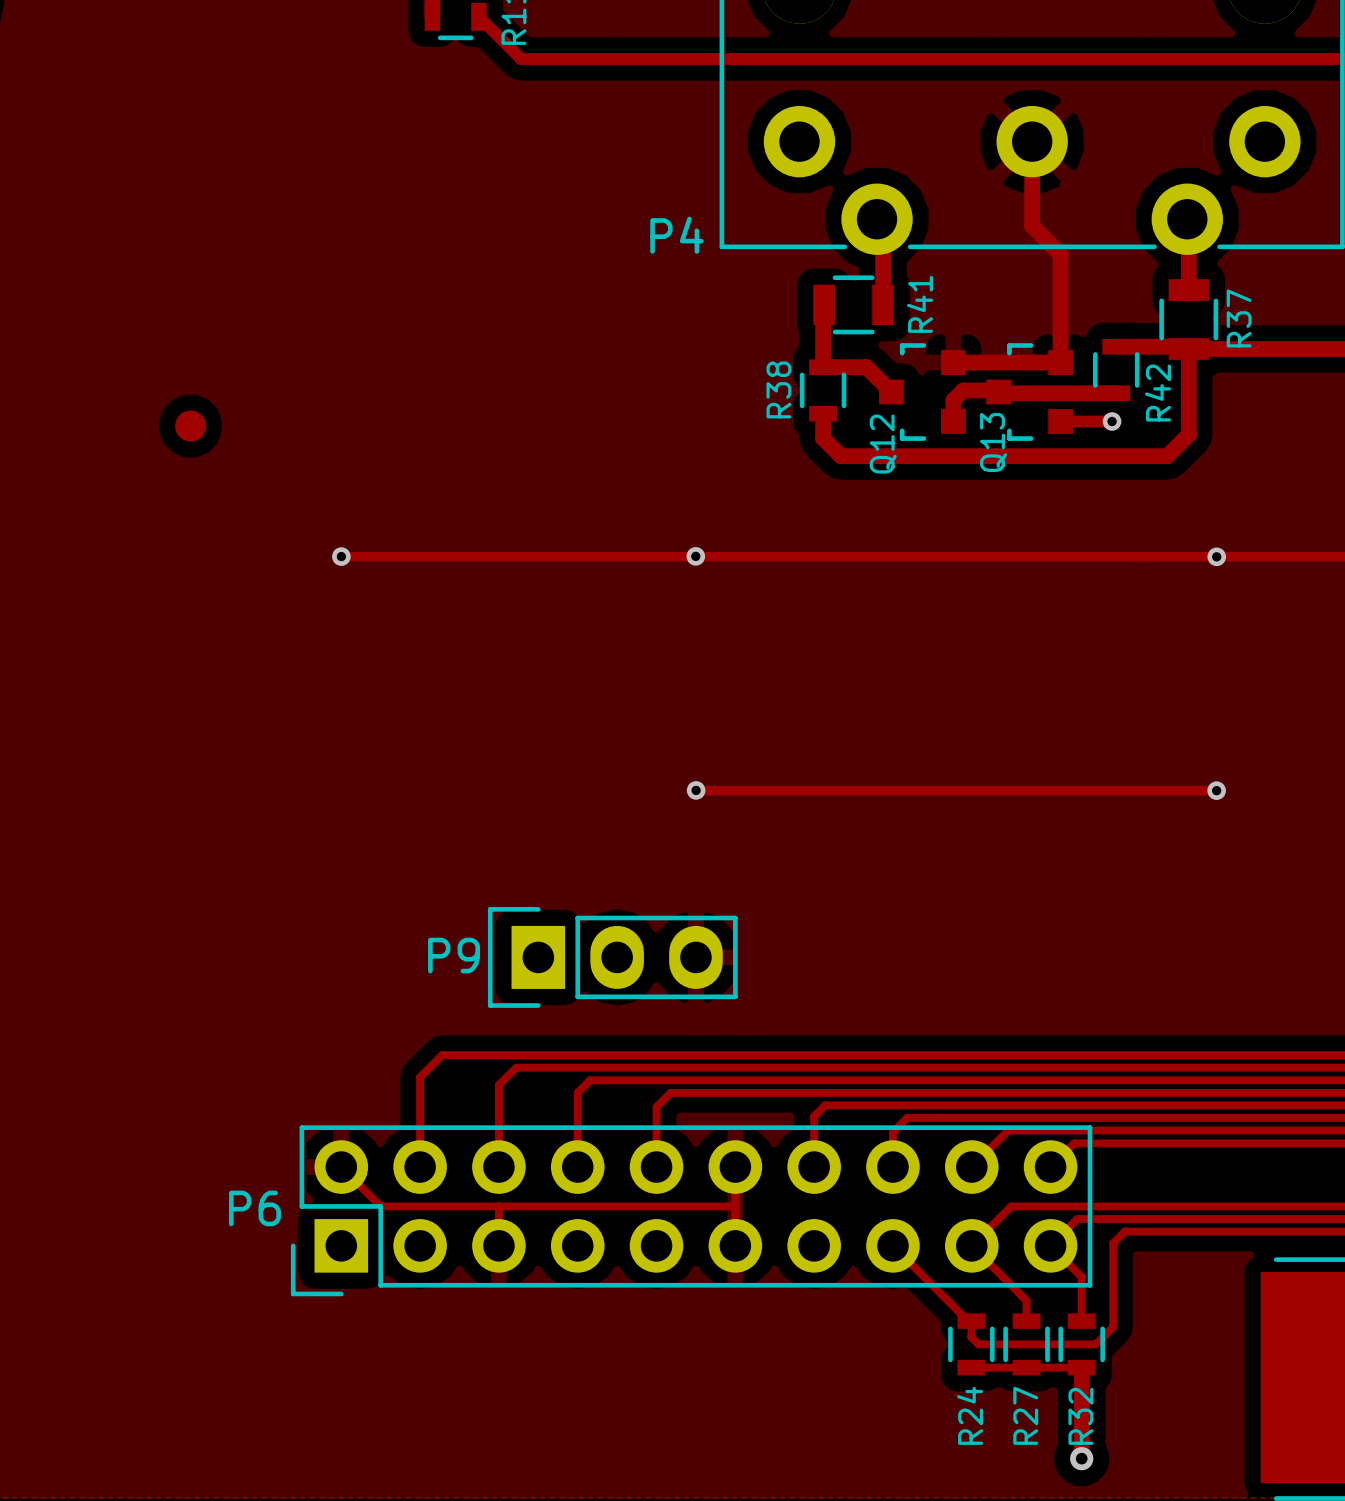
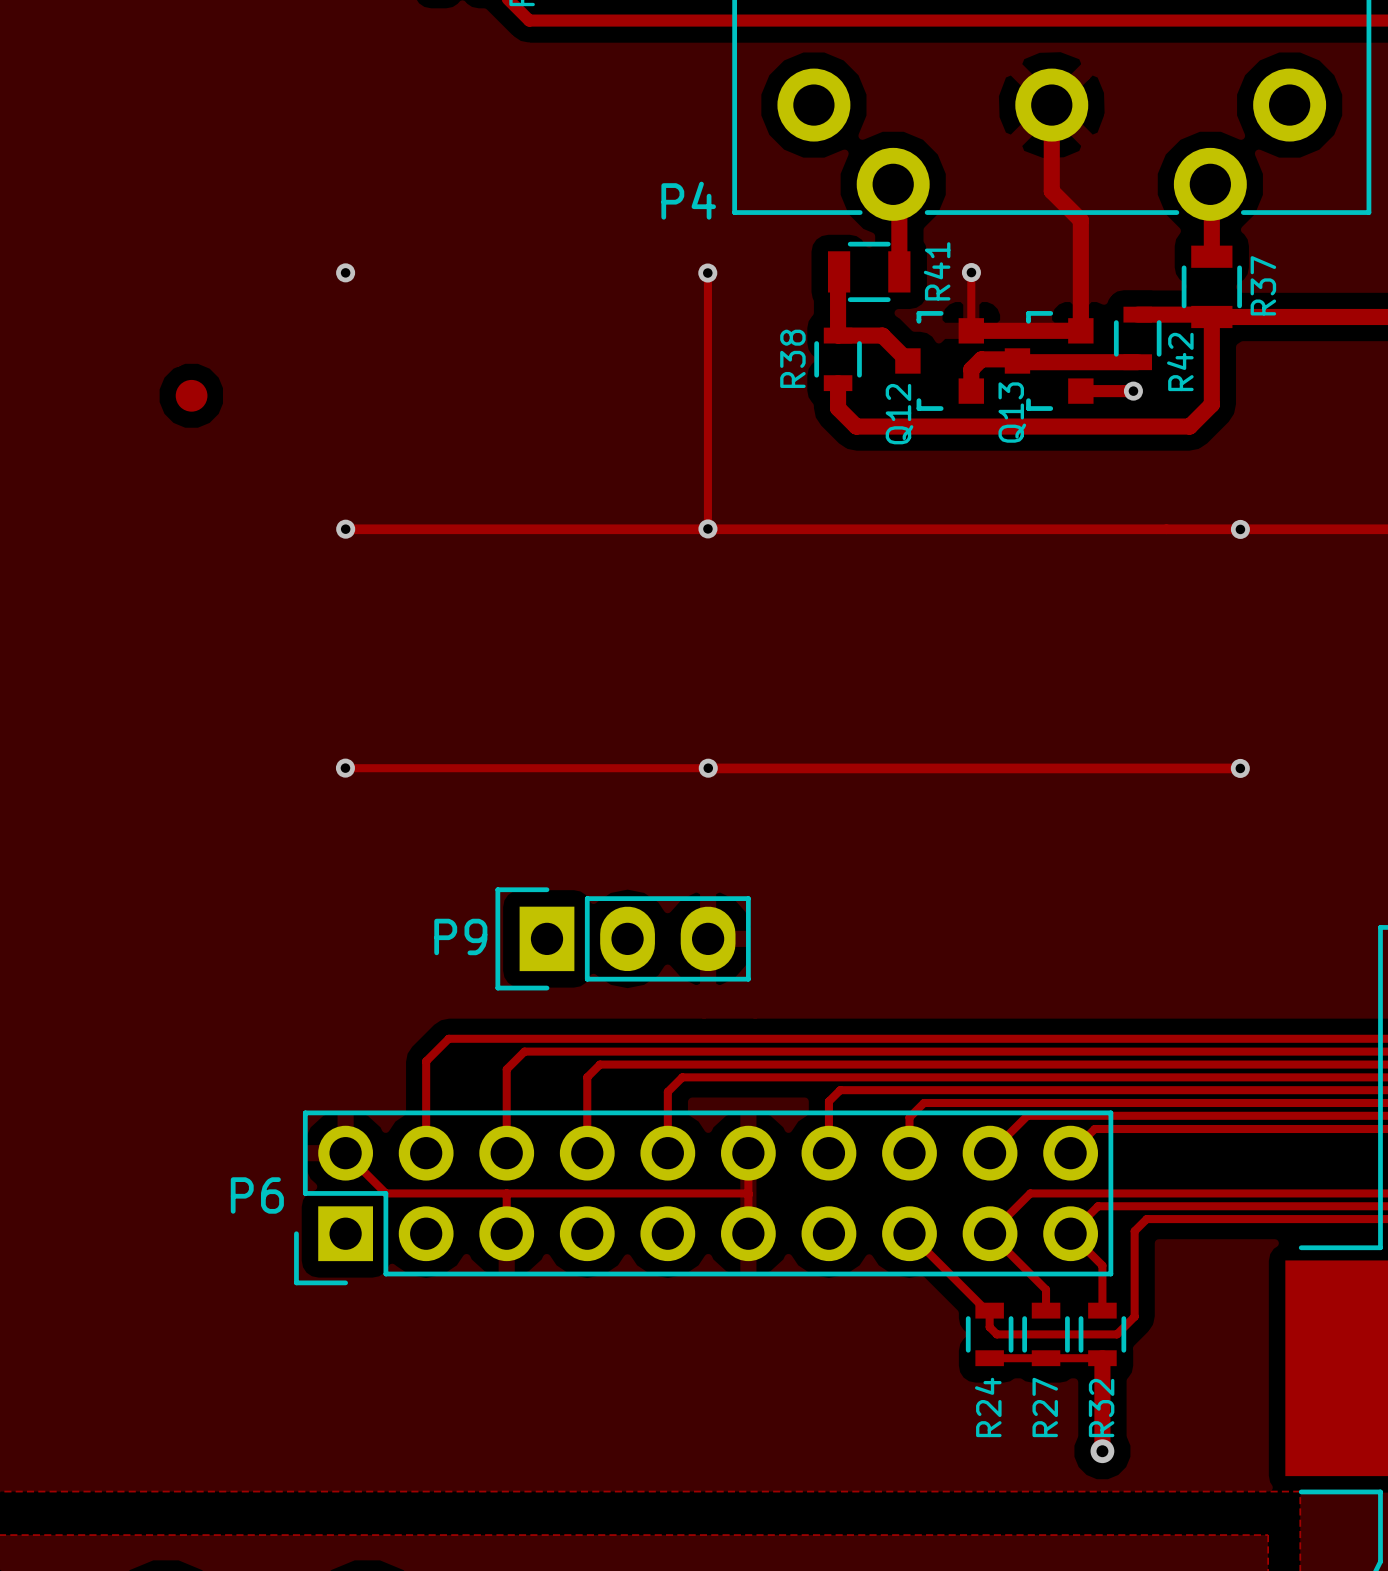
via: none -> (345, 272)
via: none -> (707, 273)
track: none -> (971, 272) (971, 330)
via: none -> (971, 272)
track: none -> (707, 273) (707, 528)
track: none -> (345, 768) (708, 768)
via: none -> (345, 768)

